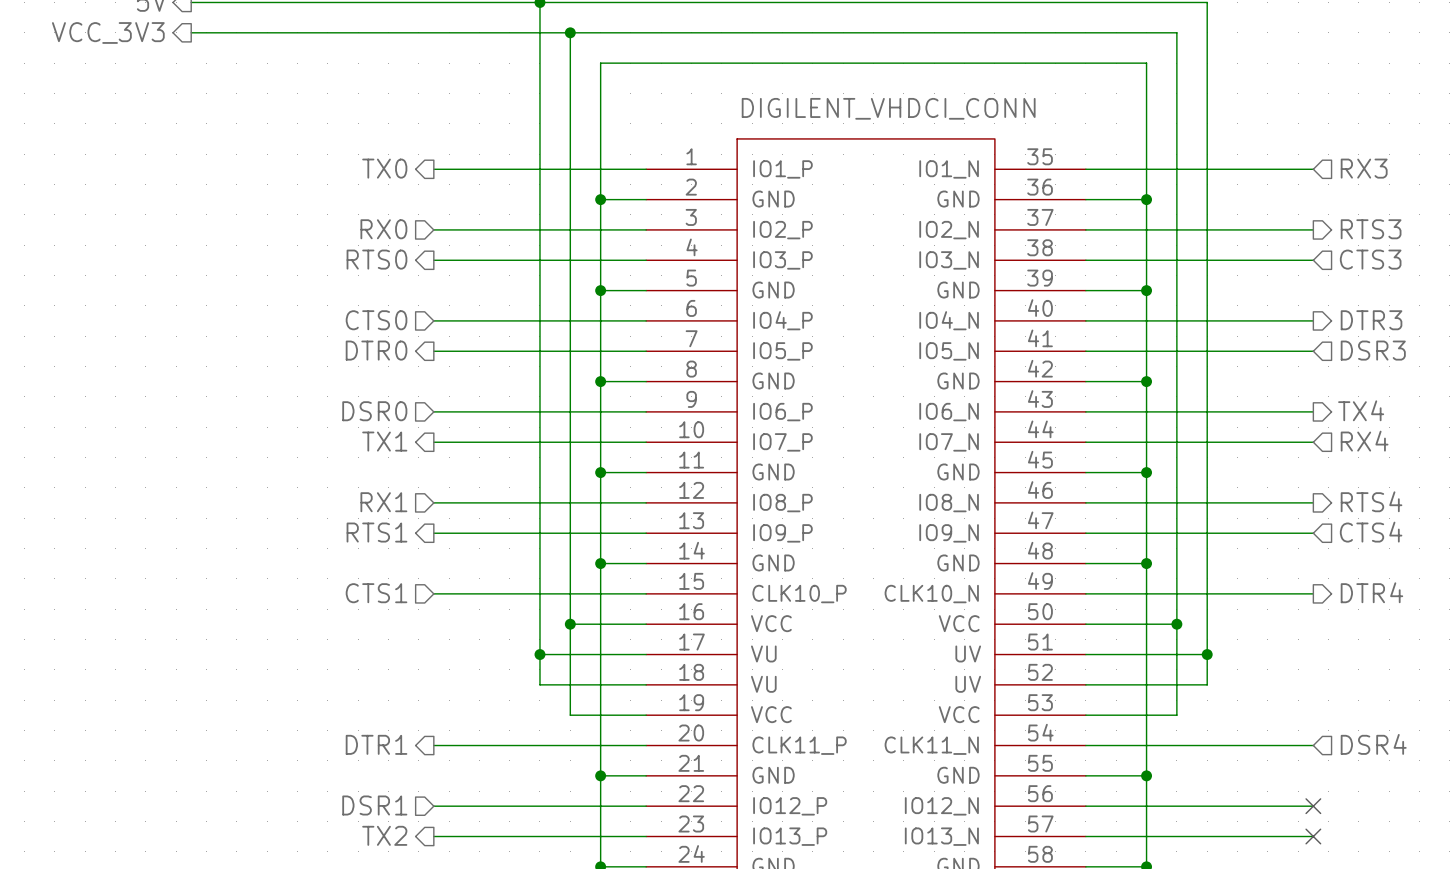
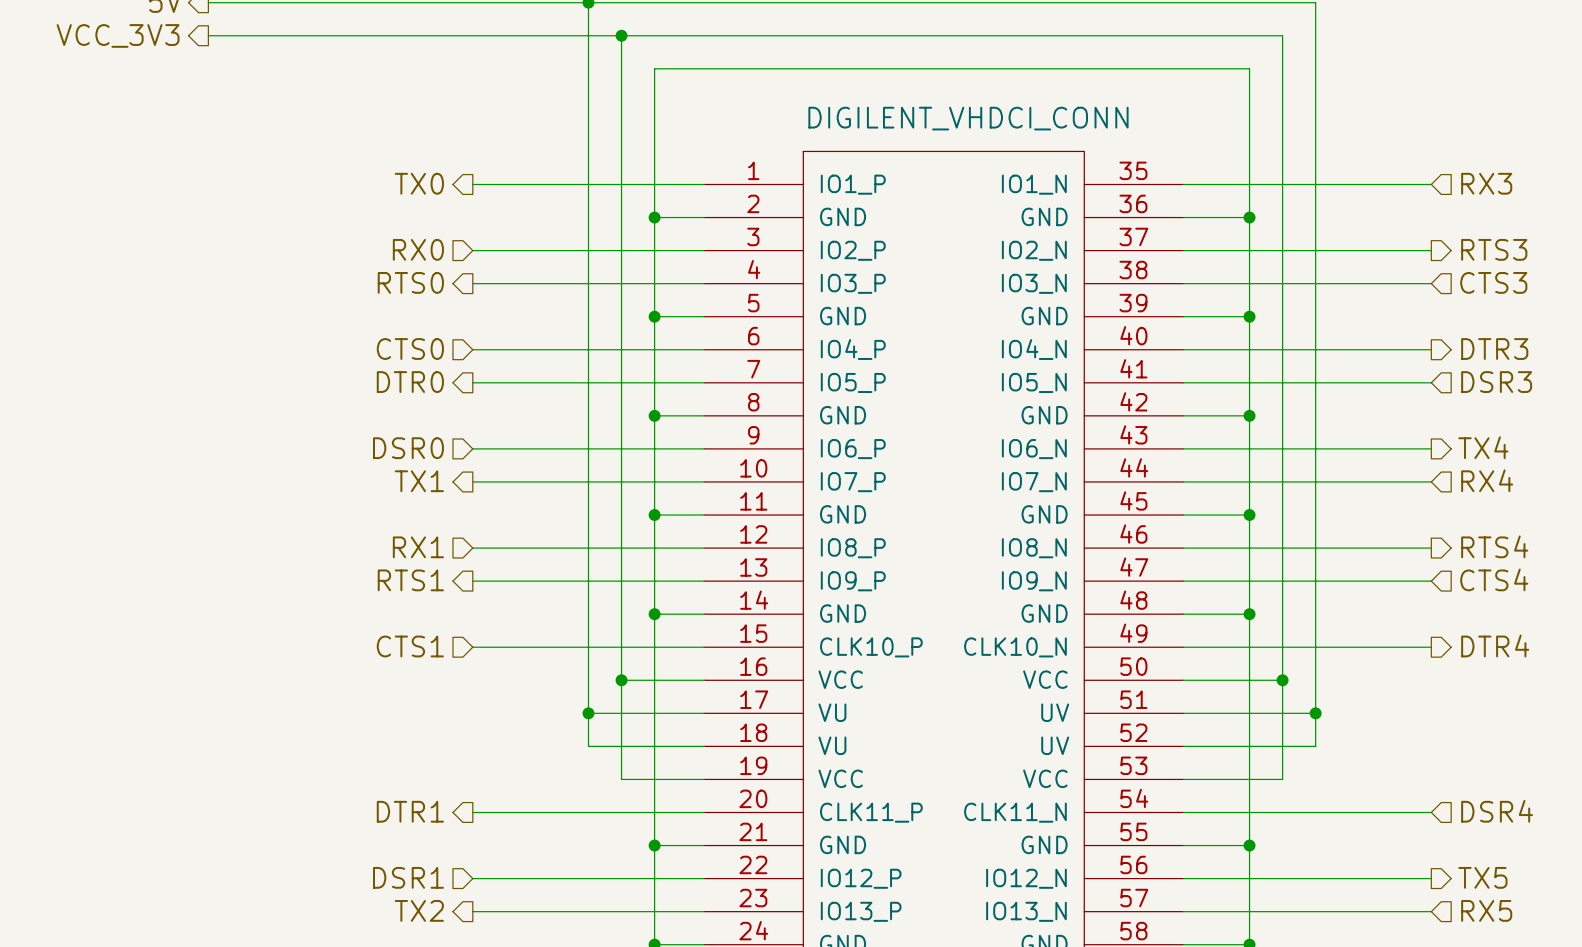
hierarchical label: none -> TX5 (1482, 877)
no-connect mark: (1313, 806) -> none
hierarchical label: none -> RX5 (1486, 910)
no-connect mark: (1313, 836) -> none

